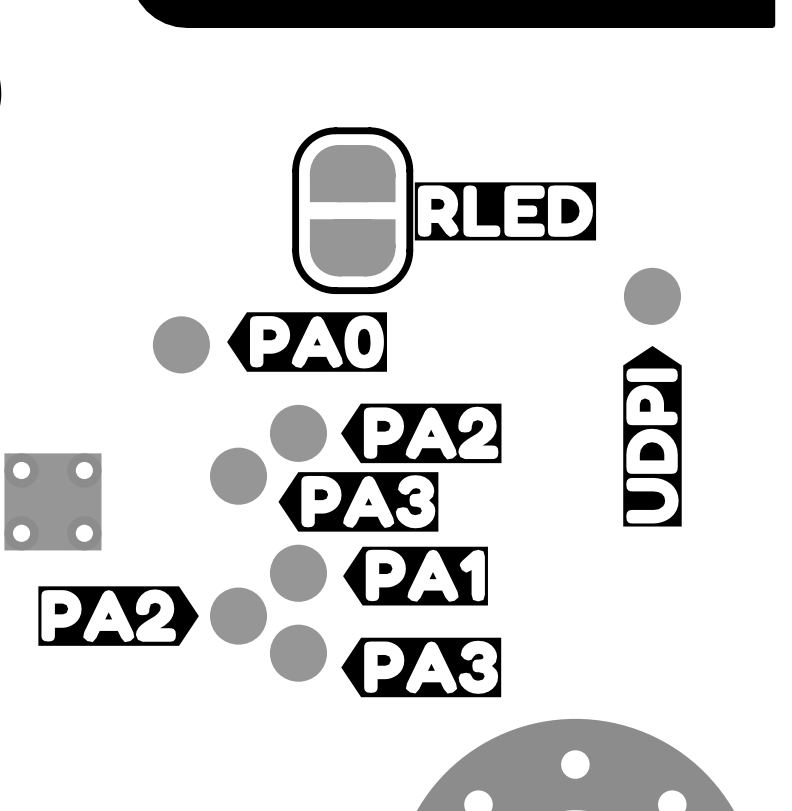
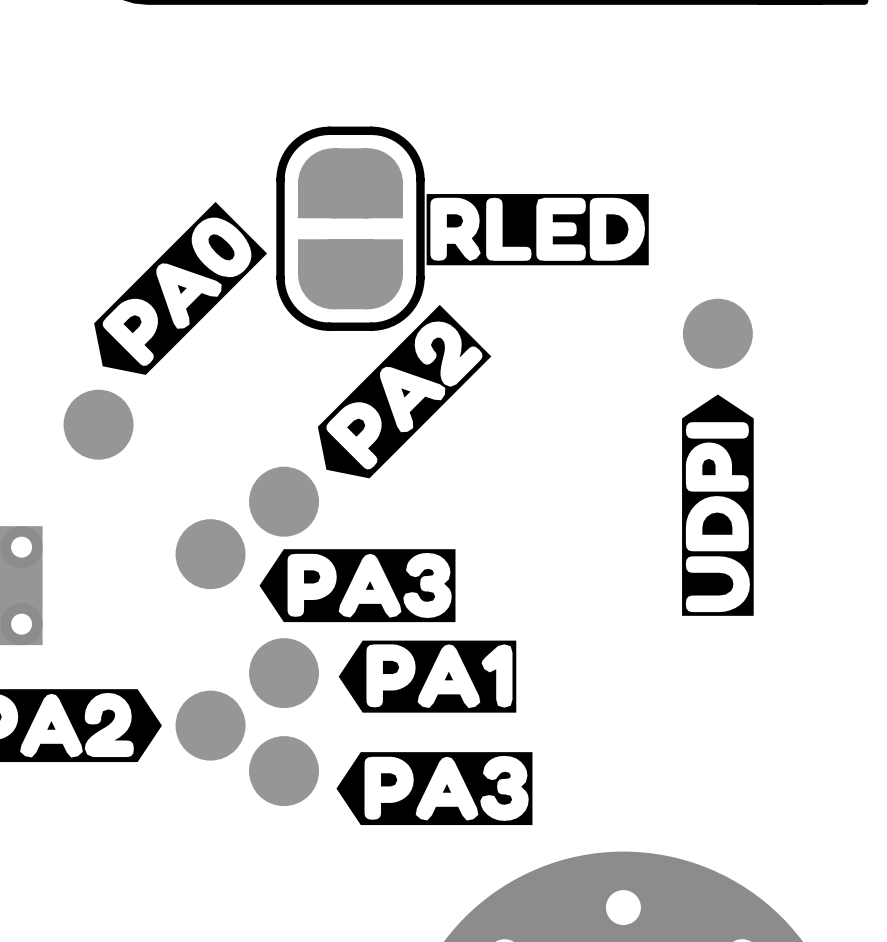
drawing: none -> [94, 201, 492, 479]
drawing: [227, 312, 502, 464] -> none
part position: (181, 344) -> (98, 424)

